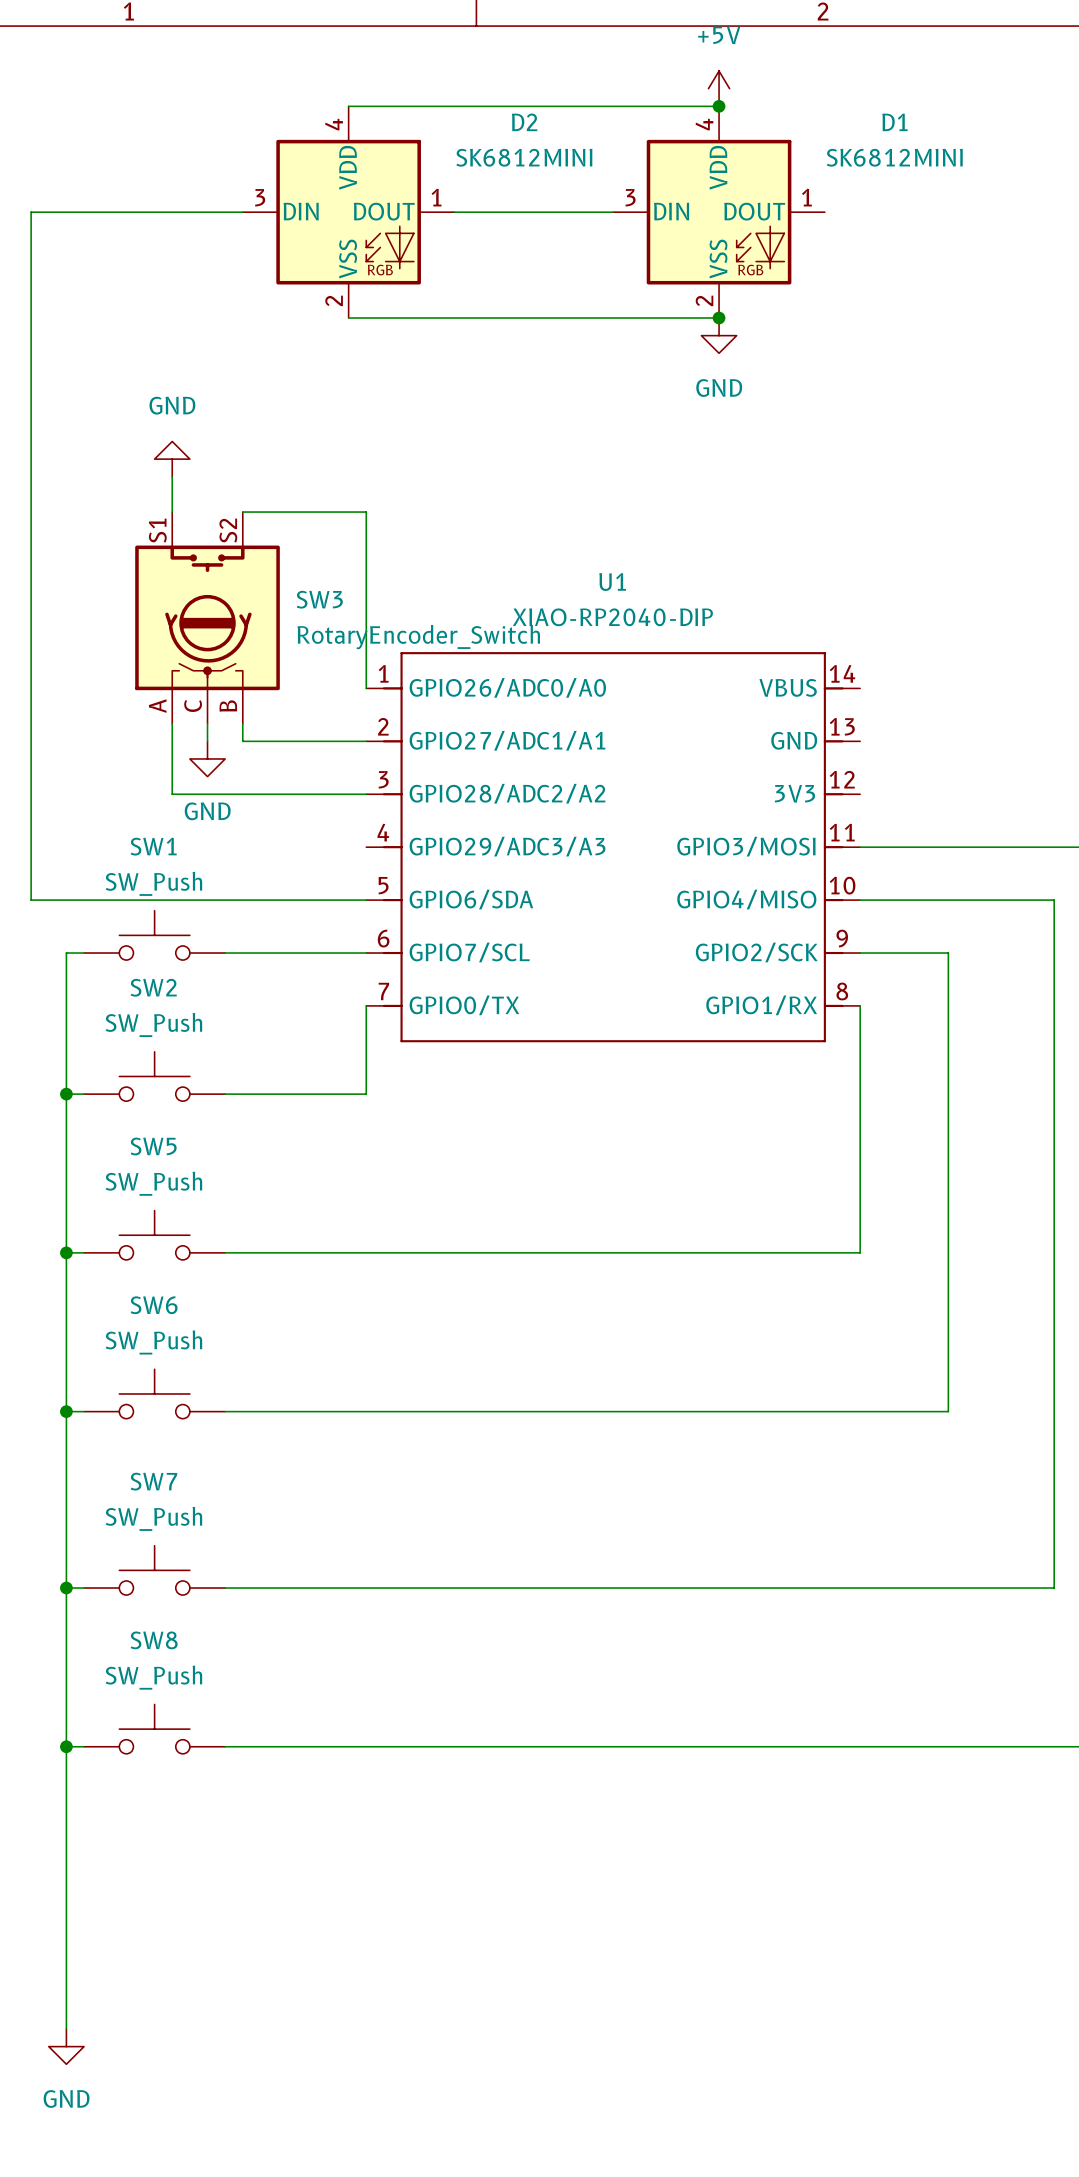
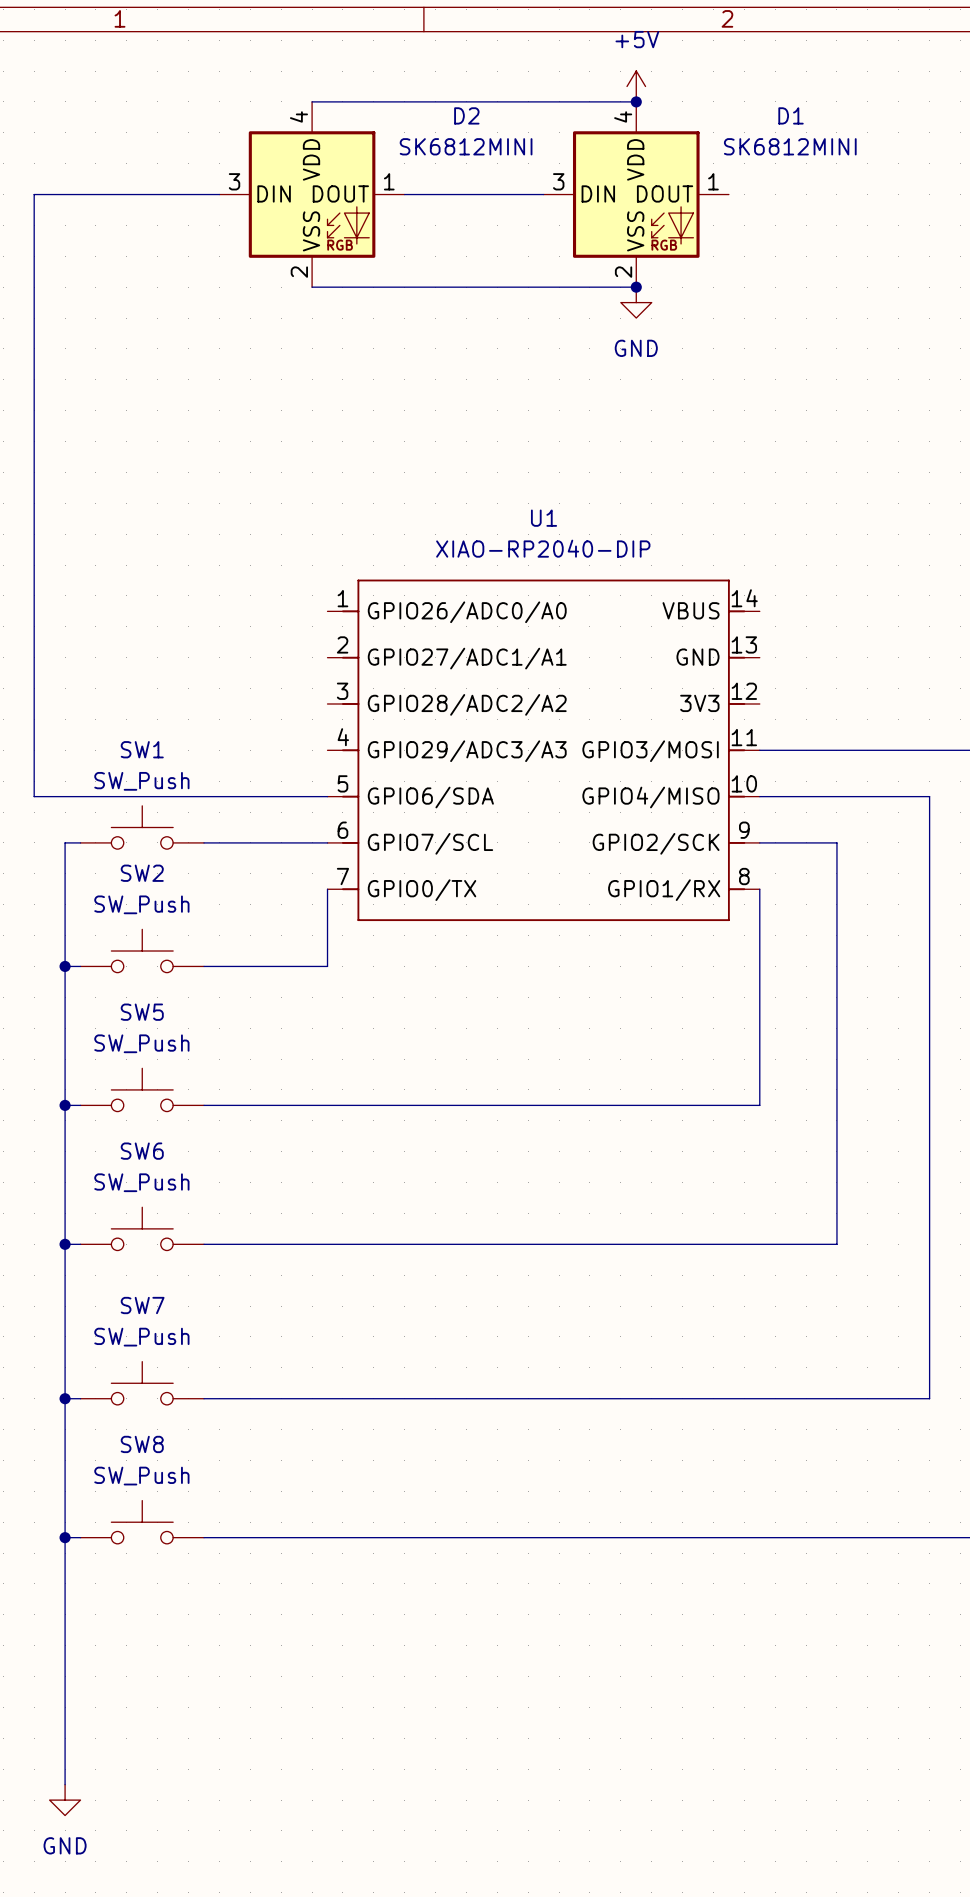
power symbol: GND (172, 459) -> none
wire: (172, 476) (172, 512) -> none
wire: (242, 512) (366, 512) (366, 688) -> none
SW3: RotaryEncoder_Switch (207, 617) -> none
wire: (172, 723) (172, 794) (366, 794) -> none
wire: (207, 723) (207, 741) -> none
wire: (242, 723) (242, 741) (366, 741) -> none
power symbol: GND (207, 758) -> none

